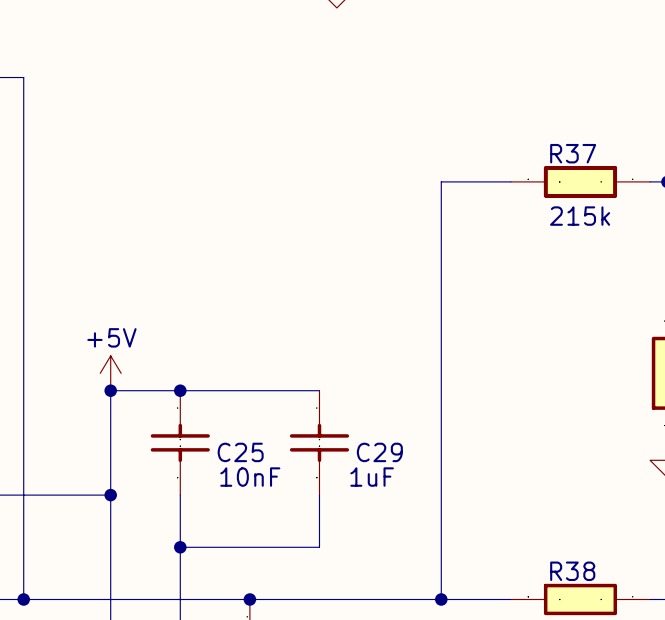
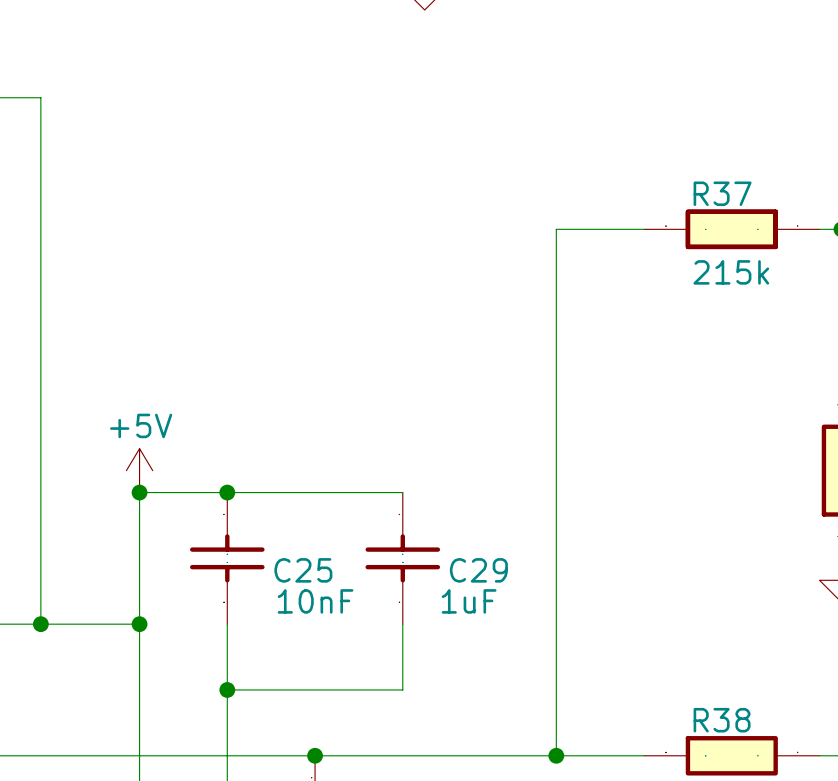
wire: (23, 77) (23, 599) -> (29, 97) (40, 97) (40, 624)
junction: none -> (40, 624)
junction: (23, 599) -> none

